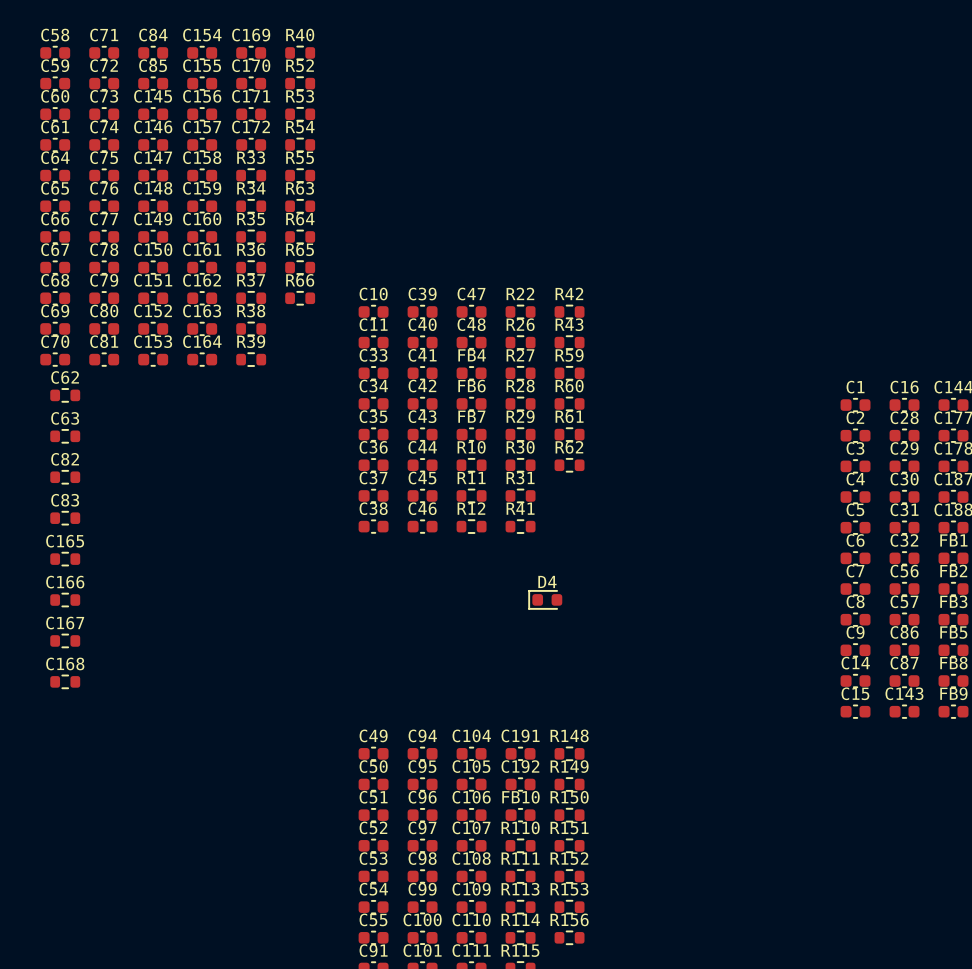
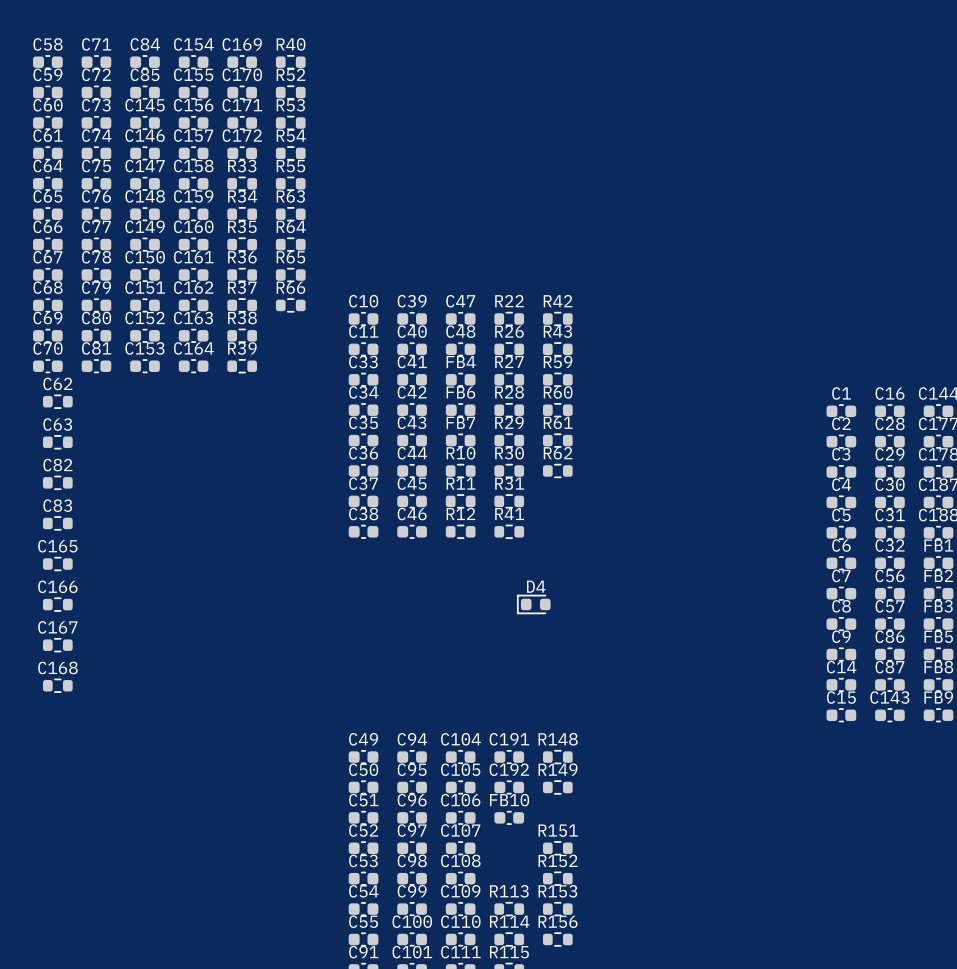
R150: (569, 815) -> none
R110: (520, 845) -> none
R111: (520, 876) -> none

